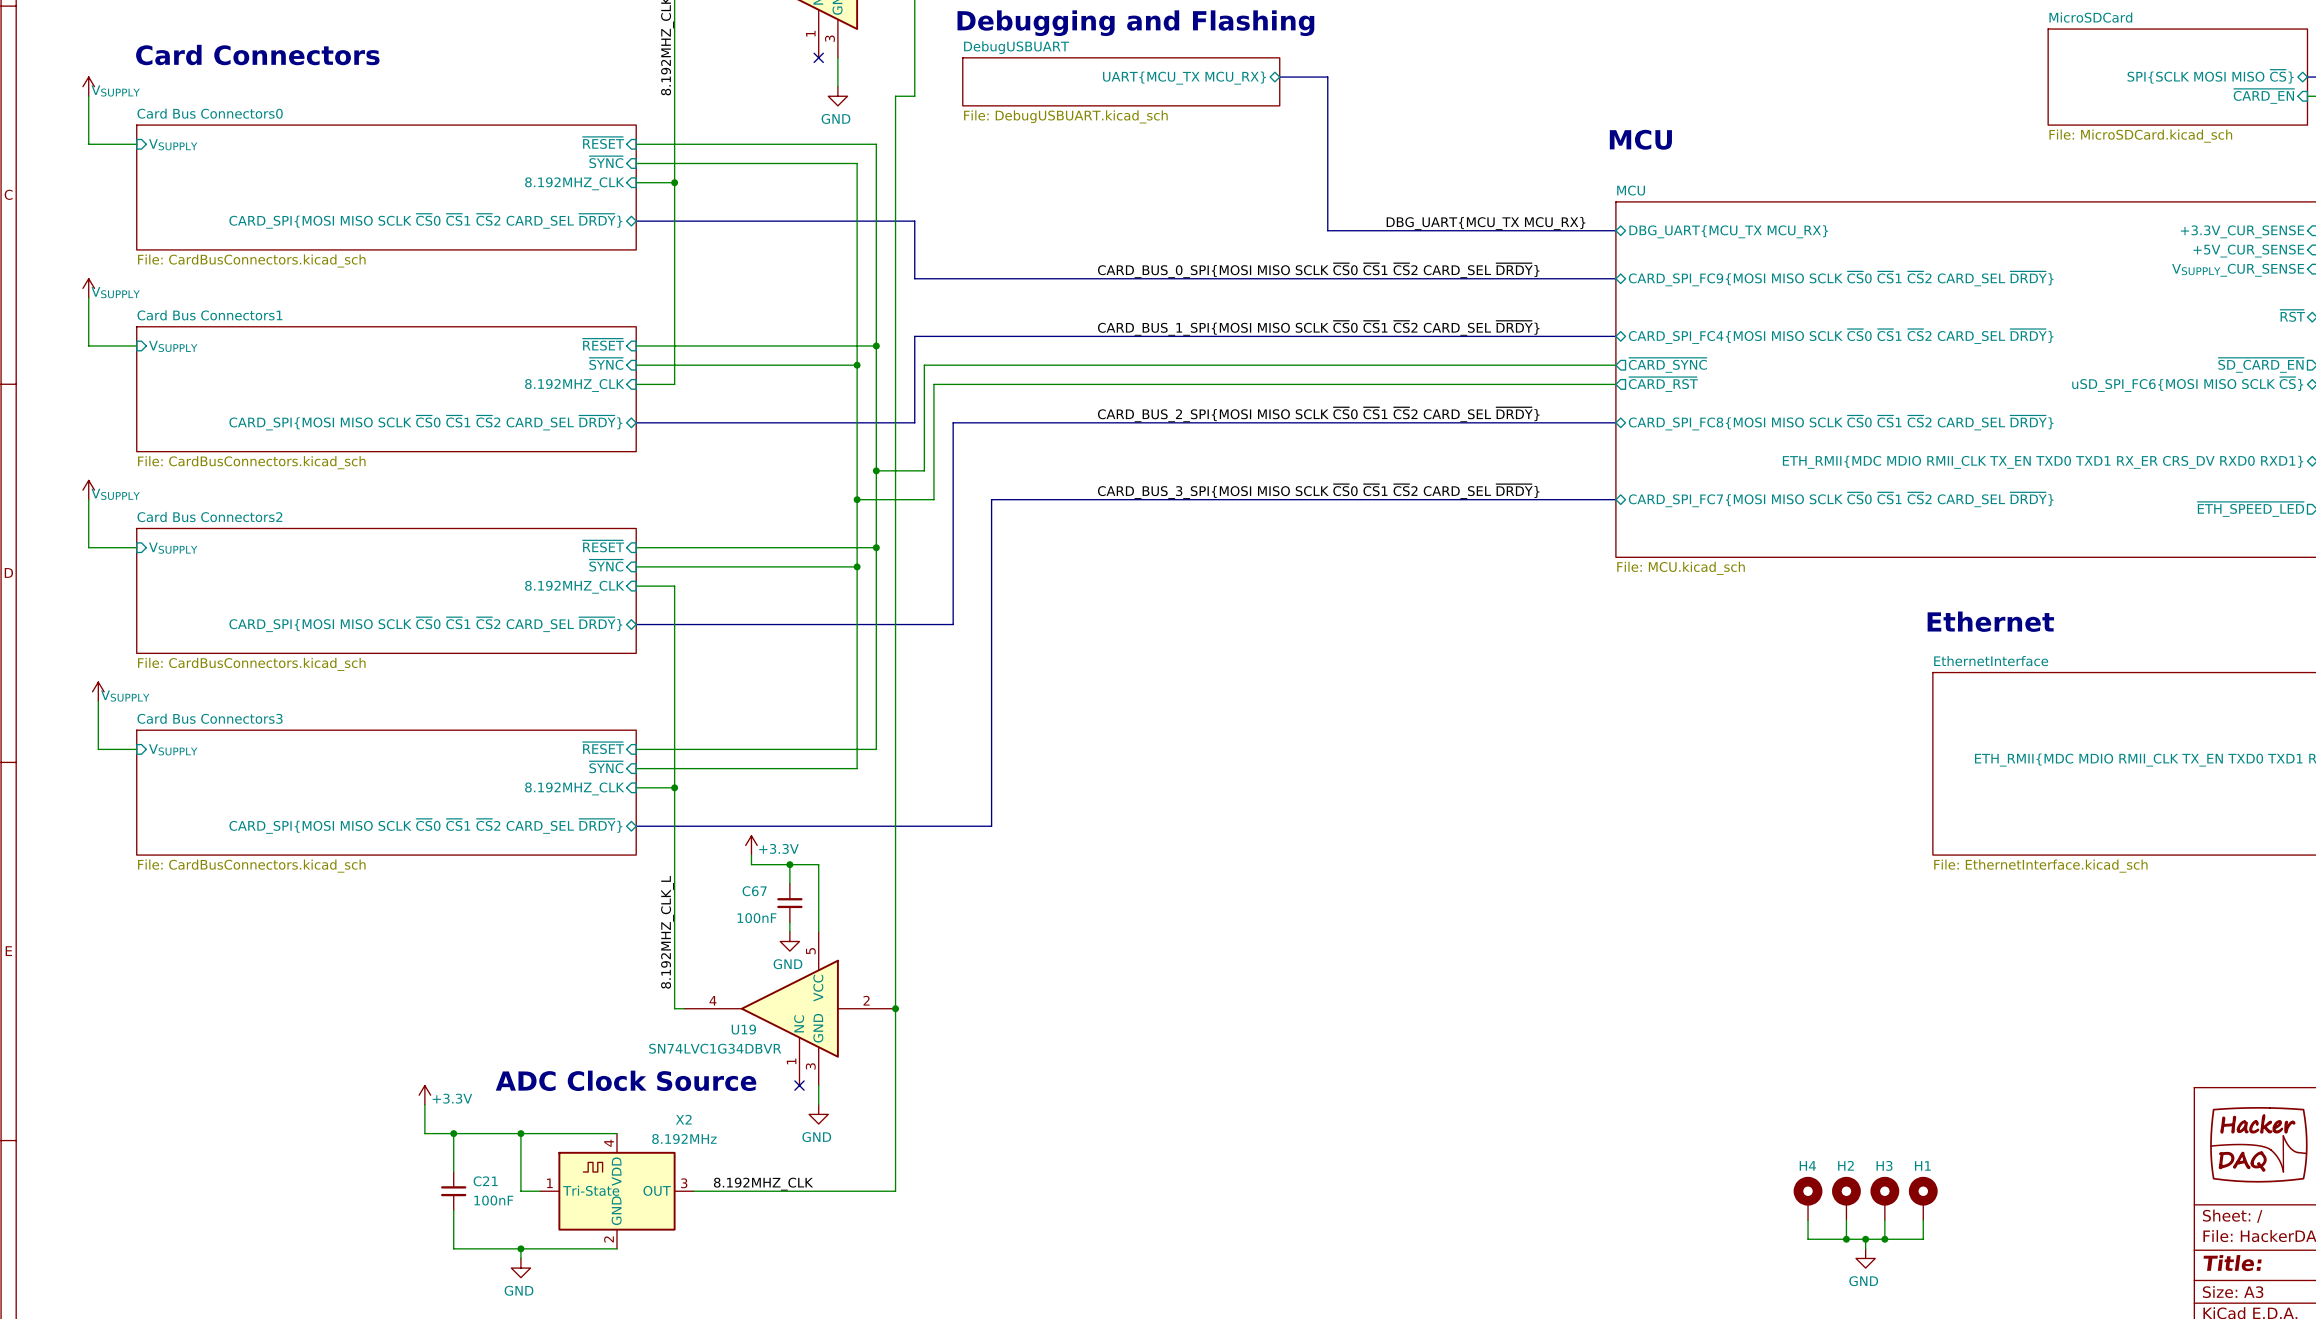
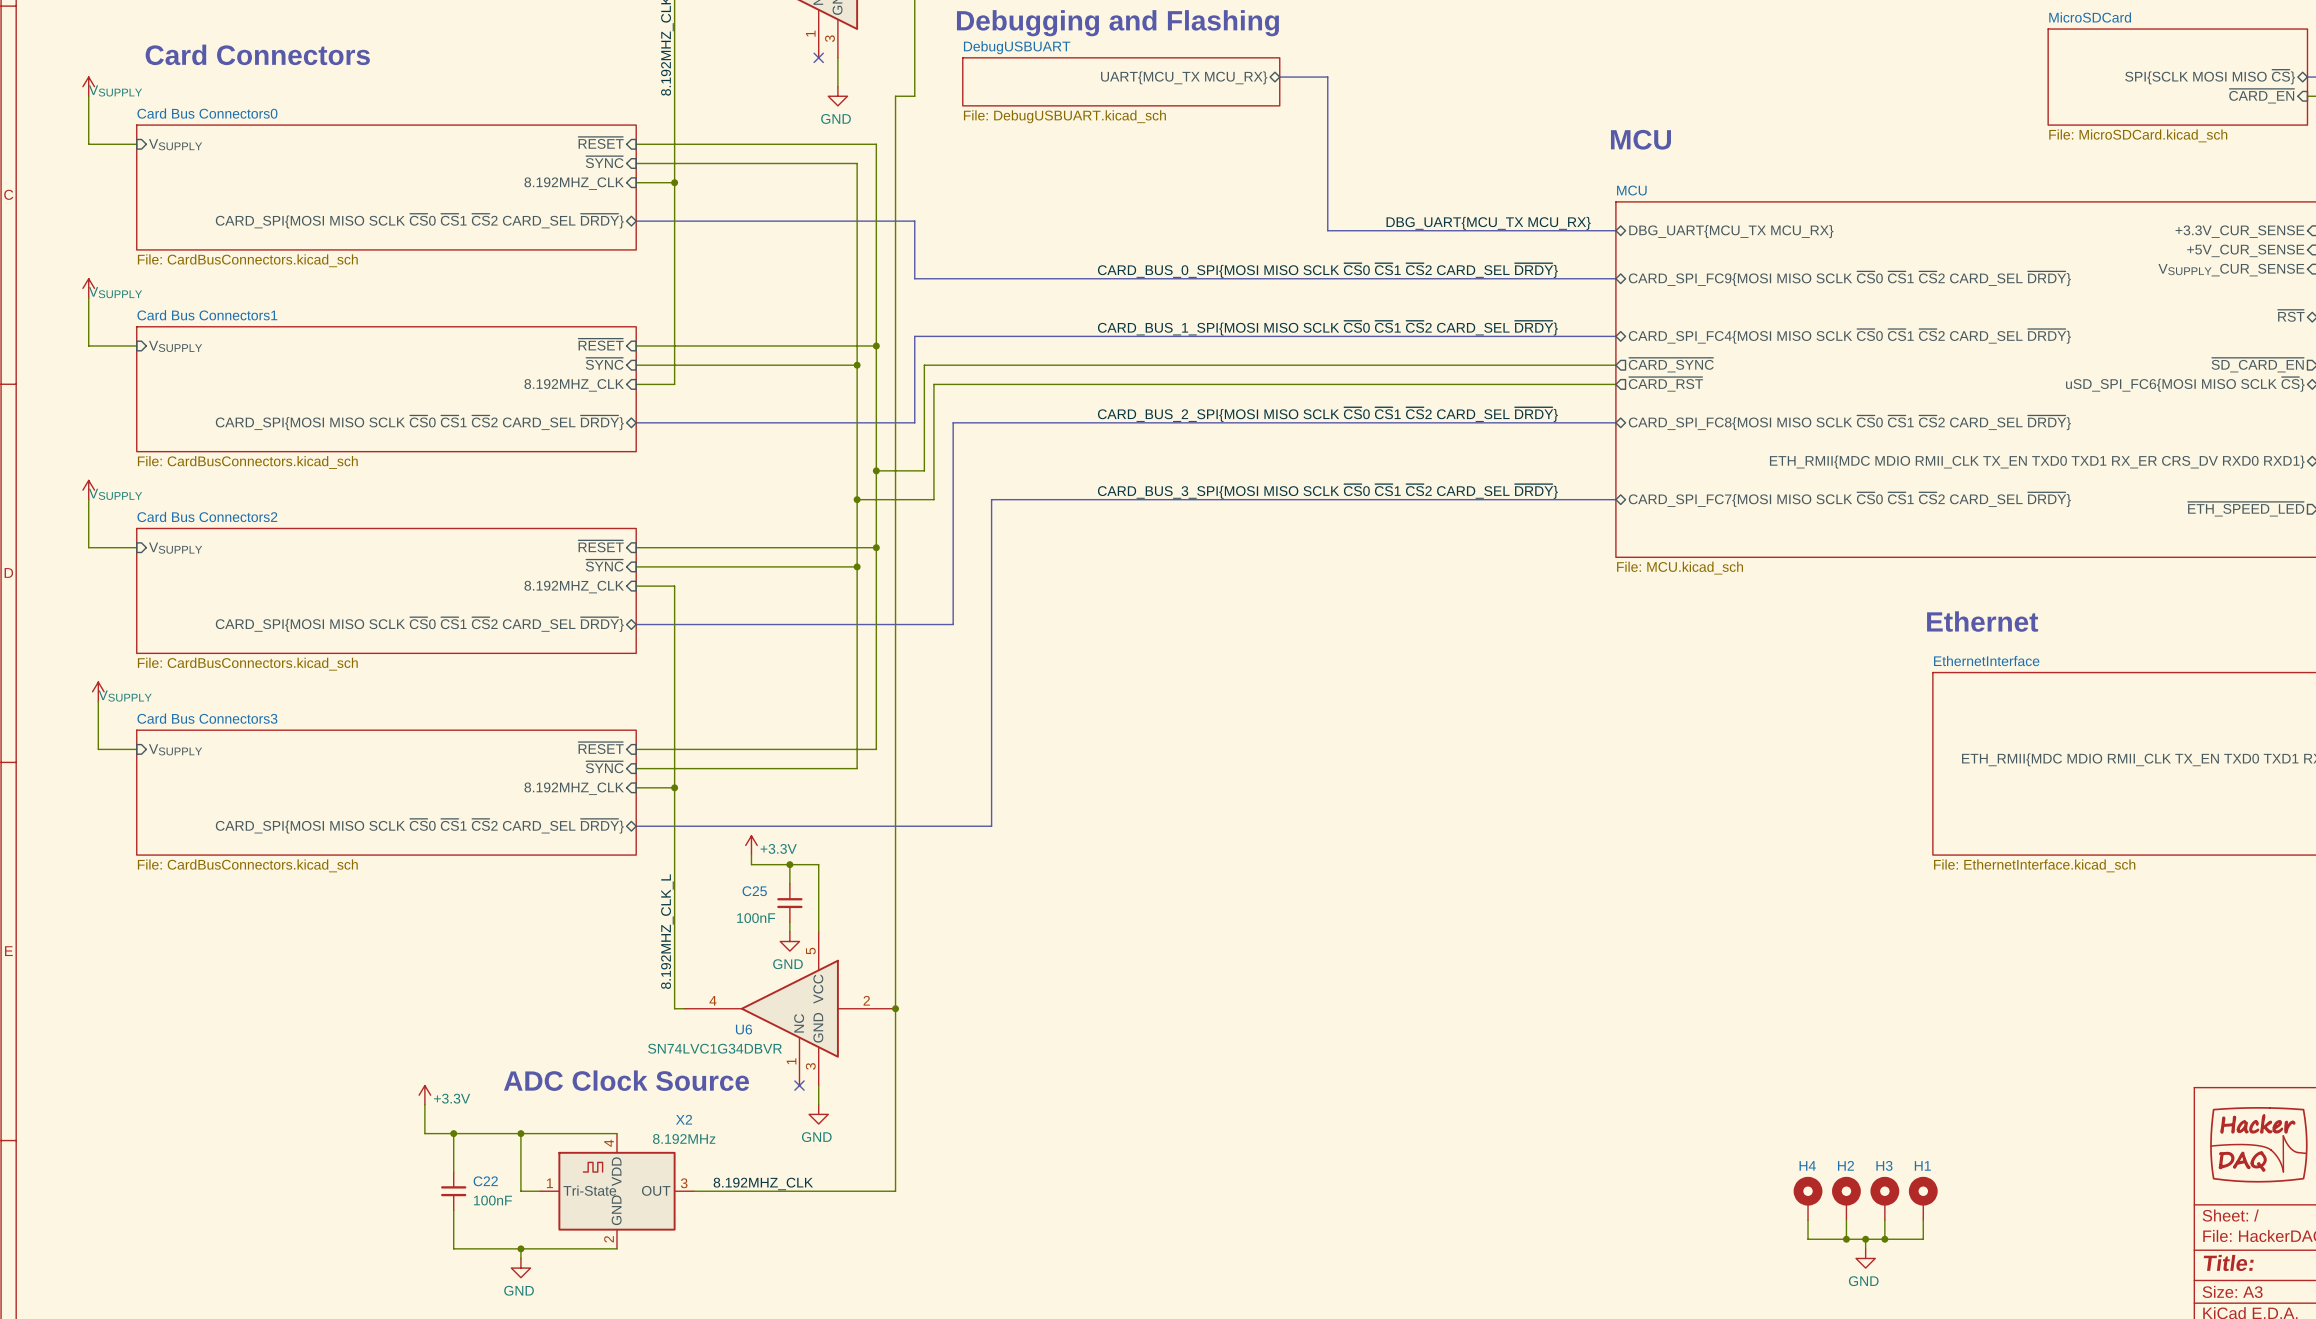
C67 name: C67 (754, 891) -> C25 (754, 891)
U19 name: U19 (743, 1029) -> U6 (744, 1029)
C21 name: C21 (485, 1181) -> C22 (485, 1181)

